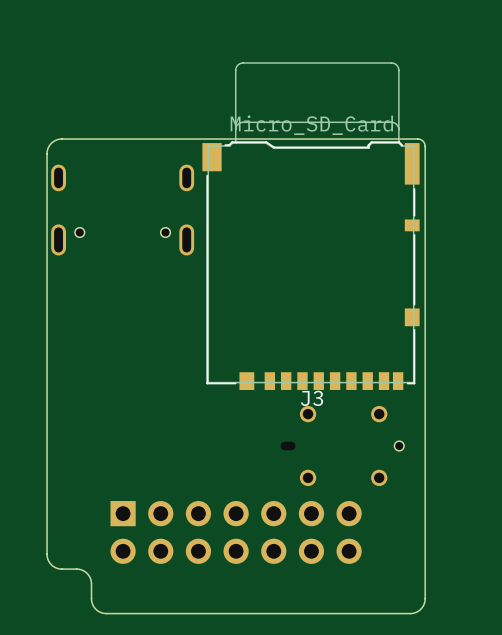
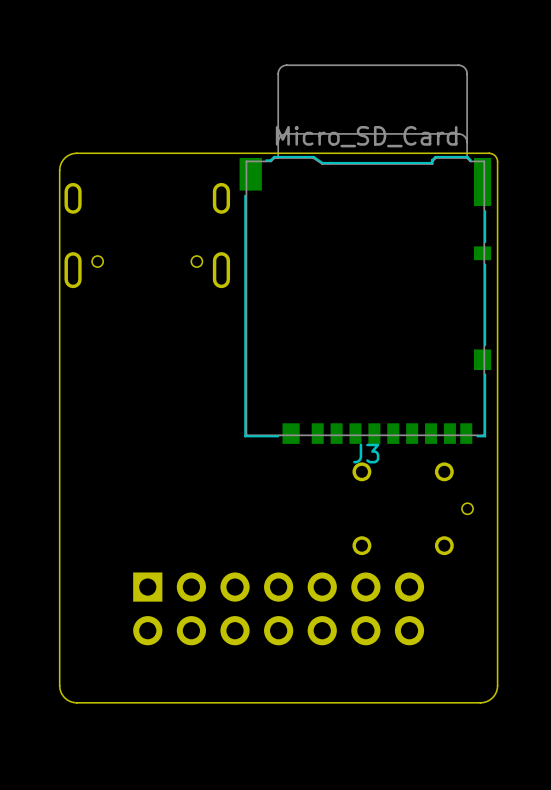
board edge: (47, 554) (49, 562) (55, 567) (79, 569) (87, 573) (91, 580) (92, 605) (98, 611) (106, 613) -> (59, 634) (59, 687) (64, 697) (74, 702) (128, 702)

